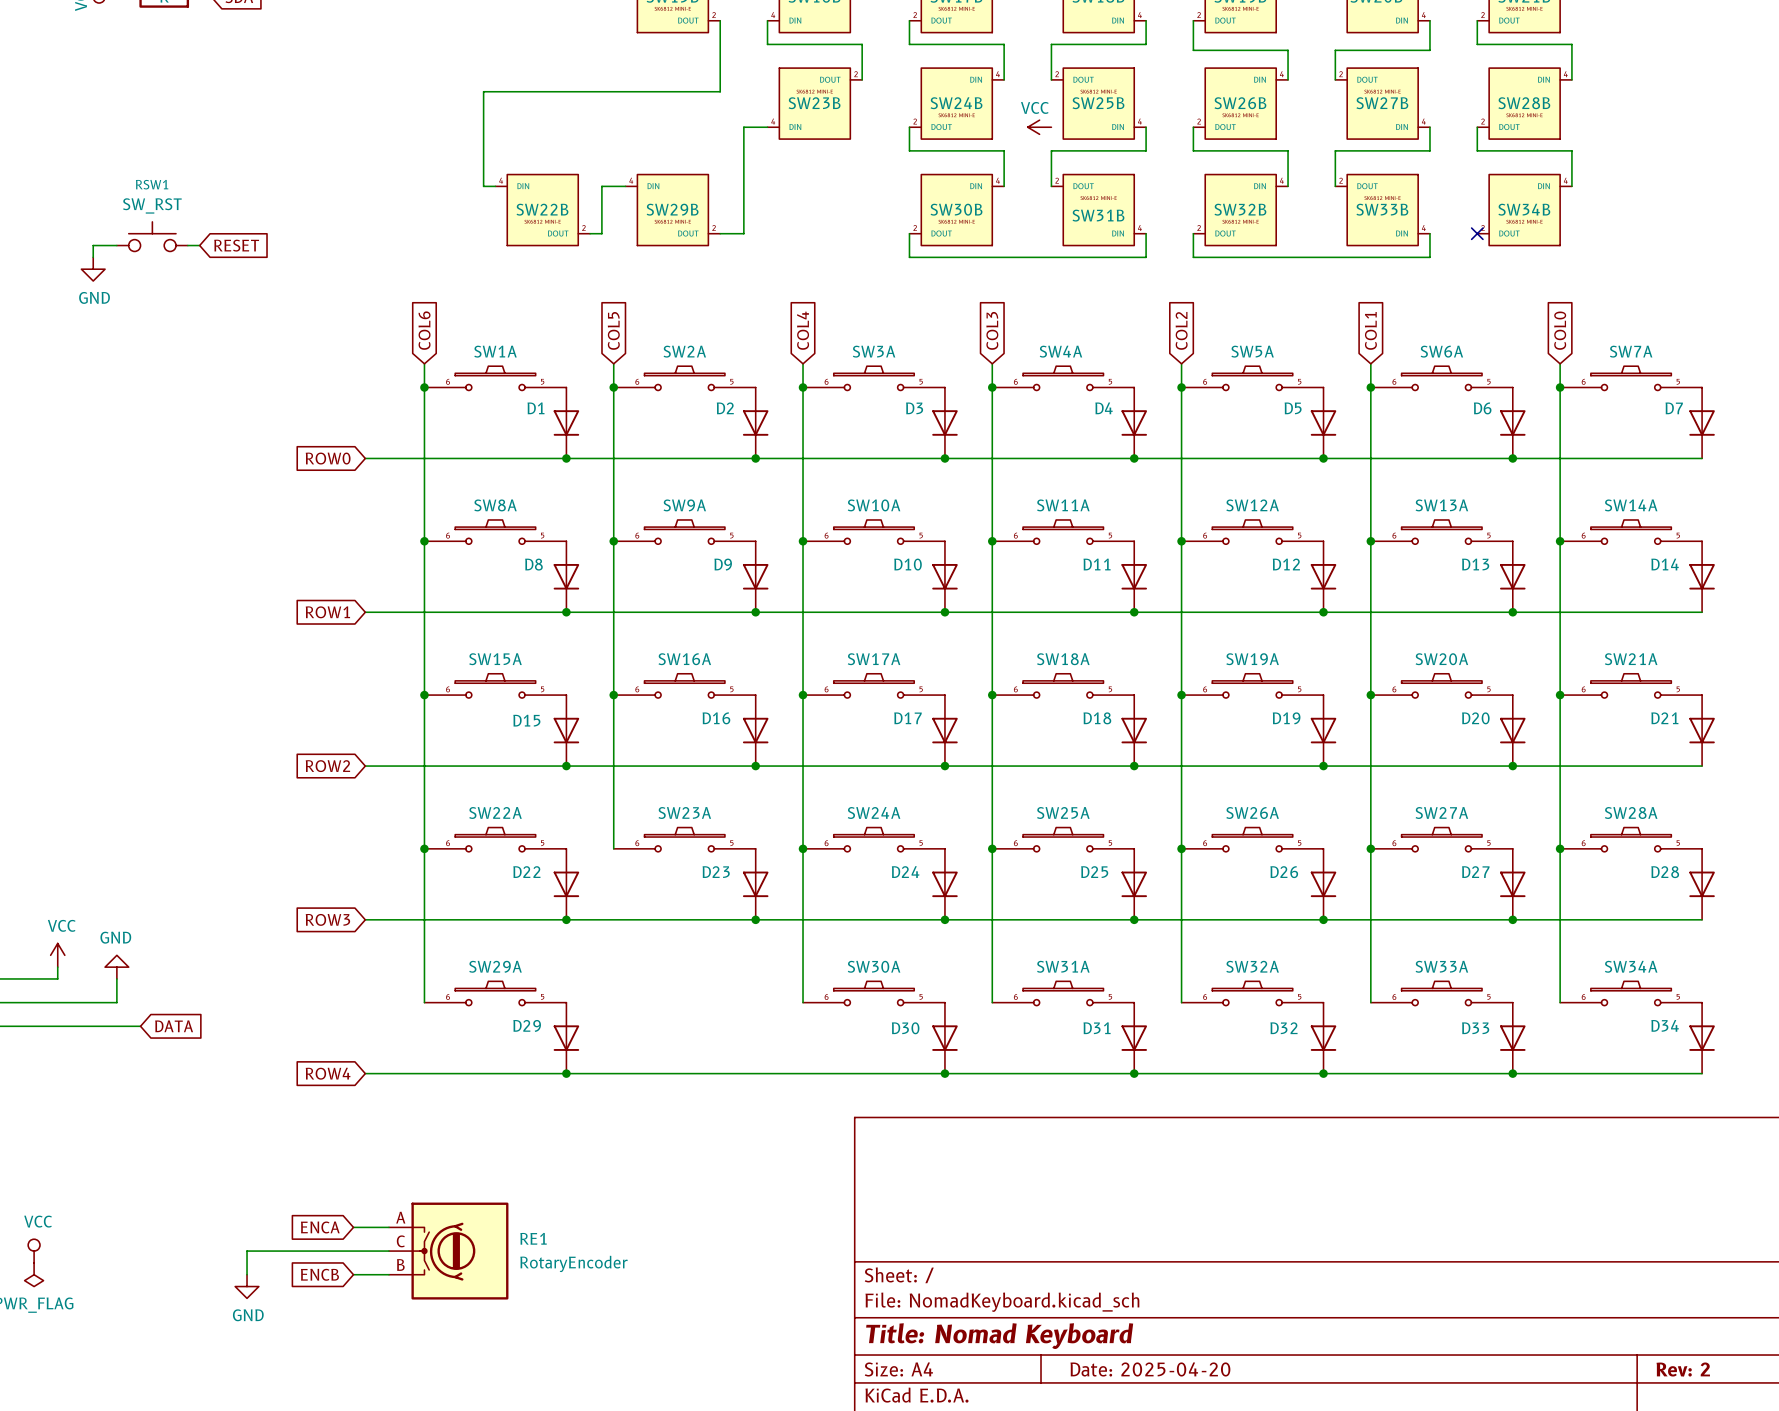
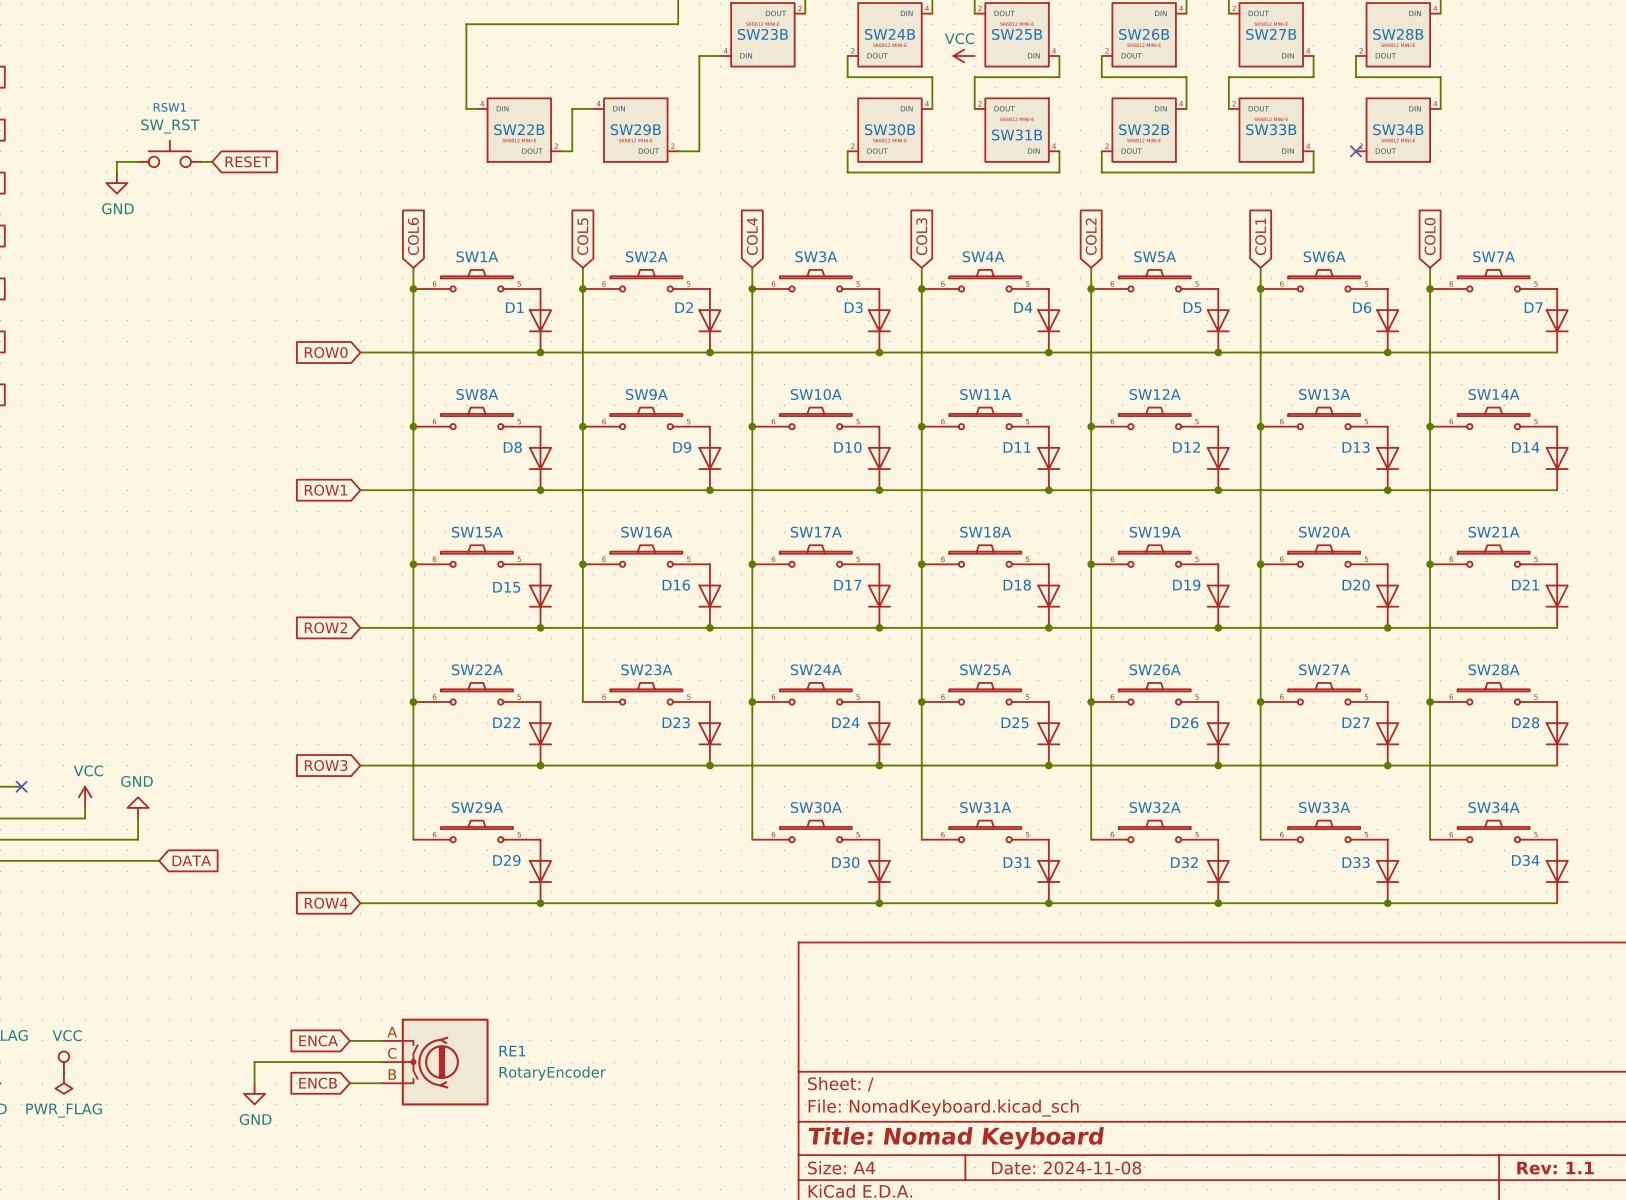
title block: Date: 2025-04-20 (1150, 1369) -> Date: 2024-11-08 (1066, 1168)
title block: Rev: 2 (1683, 1369) -> Rev: 1.1 (1555, 1168)

